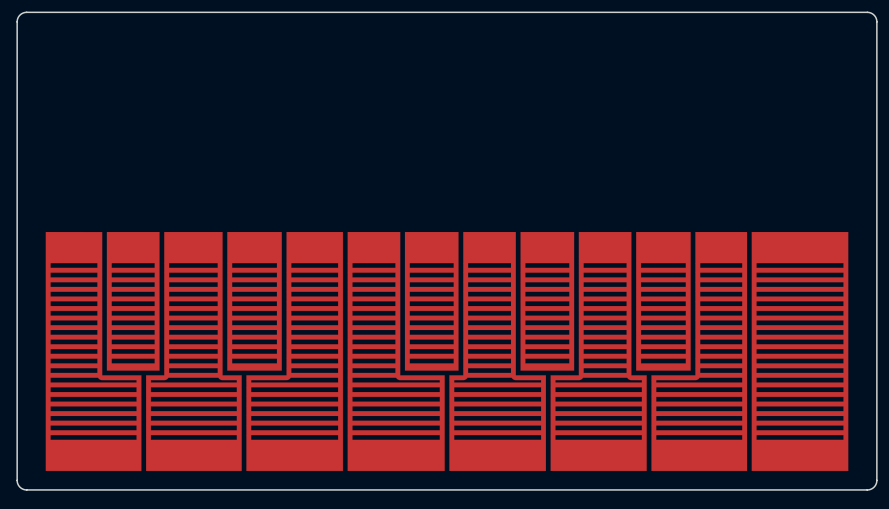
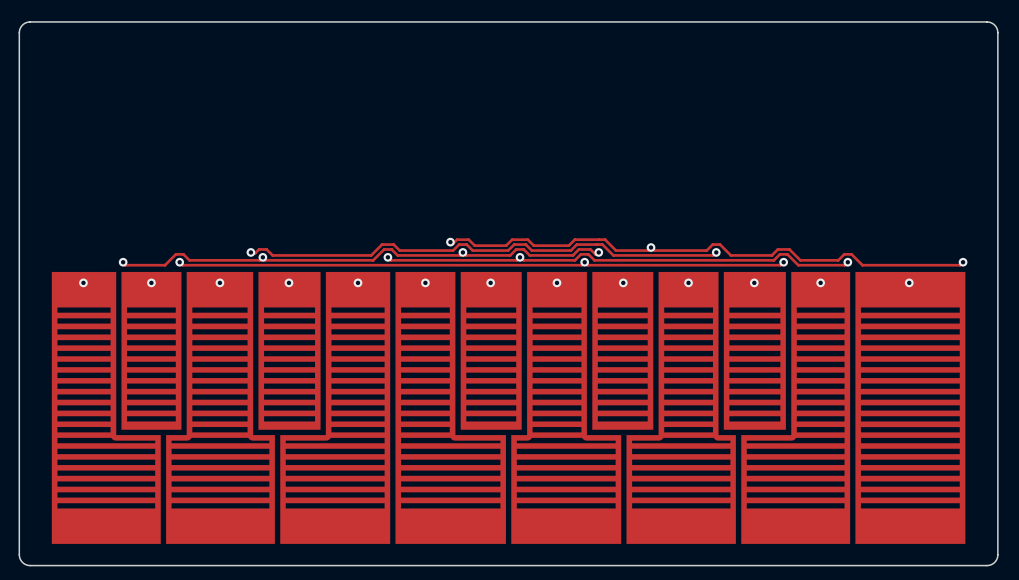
track: none -> (450, 242) (453, 243) (457, 239) (468, 239) (474, 245) (506, 245) (512, 239) (527, 239) (533, 245) (568, 245) (574, 239) (605, 239) (615, 250) (648, 250) (651, 247) (654, 250) (706, 250) (712, 244) (720, 244) (730, 255) (771, 255) (777, 249) (789, 249) (800, 260) (838, 260) (844, 254) (851, 254) (862, 265) (960, 265) (963, 262)
via: none -> (450, 242)
via: none -> (651, 247)
track: none -> (250, 252) (254, 253) (259, 249) (266, 249) (272, 255) (371, 255) (382, 244) (393, 244) (399, 250) (453, 250) (459, 244) (466, 244) (472, 250) (508, 250) (514, 244) (525, 244) (531, 250) (570, 250) (576, 244) (602, 244) (613, 255) (713, 255) (716, 252)
via: none -> (250, 252)
via: none -> (462, 252)
track: none -> (598, 252) (595, 254) (590, 249) (578, 249) (572, 255) (529, 255) (523, 249) (516, 249) (510, 255) (465, 255) (462, 252) (460, 255) (397, 255) (391, 249) (384, 249) (373, 260) (265, 260) (262, 257) (259, 260) (189, 260) (183, 254) (175, 254) (165, 265) (125, 265) (123, 262)
via: none -> (598, 252)
via: none -> (716, 252)
via: none -> (262, 257)
track: none -> (387, 257) (390, 260) (517, 260) (520, 257) (523, 260) (574, 260) (580, 254) (588, 254) (594, 260) (773, 260) (779, 254) (787, 254) (798, 265) (844, 265) (847, 262)
via: none -> (387, 257)
via: none -> (520, 257)
via: none -> (123, 262)
track: none -> (179, 262) (182, 265) (581, 265) (584, 262) (587, 265) (780, 265) (783, 262)
via: none -> (179, 262)
via: none -> (584, 262)
via: none -> (783, 262)
via: none -> (847, 262)
via: none -> (963, 262)
via: none -> (83, 282)
via: none -> (151, 282)
via: none -> (219, 282)
via: none -> (288, 282)
via: none -> (358, 282)
via: none -> (425, 282)
via: none -> (490, 282)
via: none -> (556, 282)
via: none -> (623, 282)
via: none -> (688, 282)
via: none -> (754, 282)
via: none -> (820, 282)
via: none -> (909, 282)

